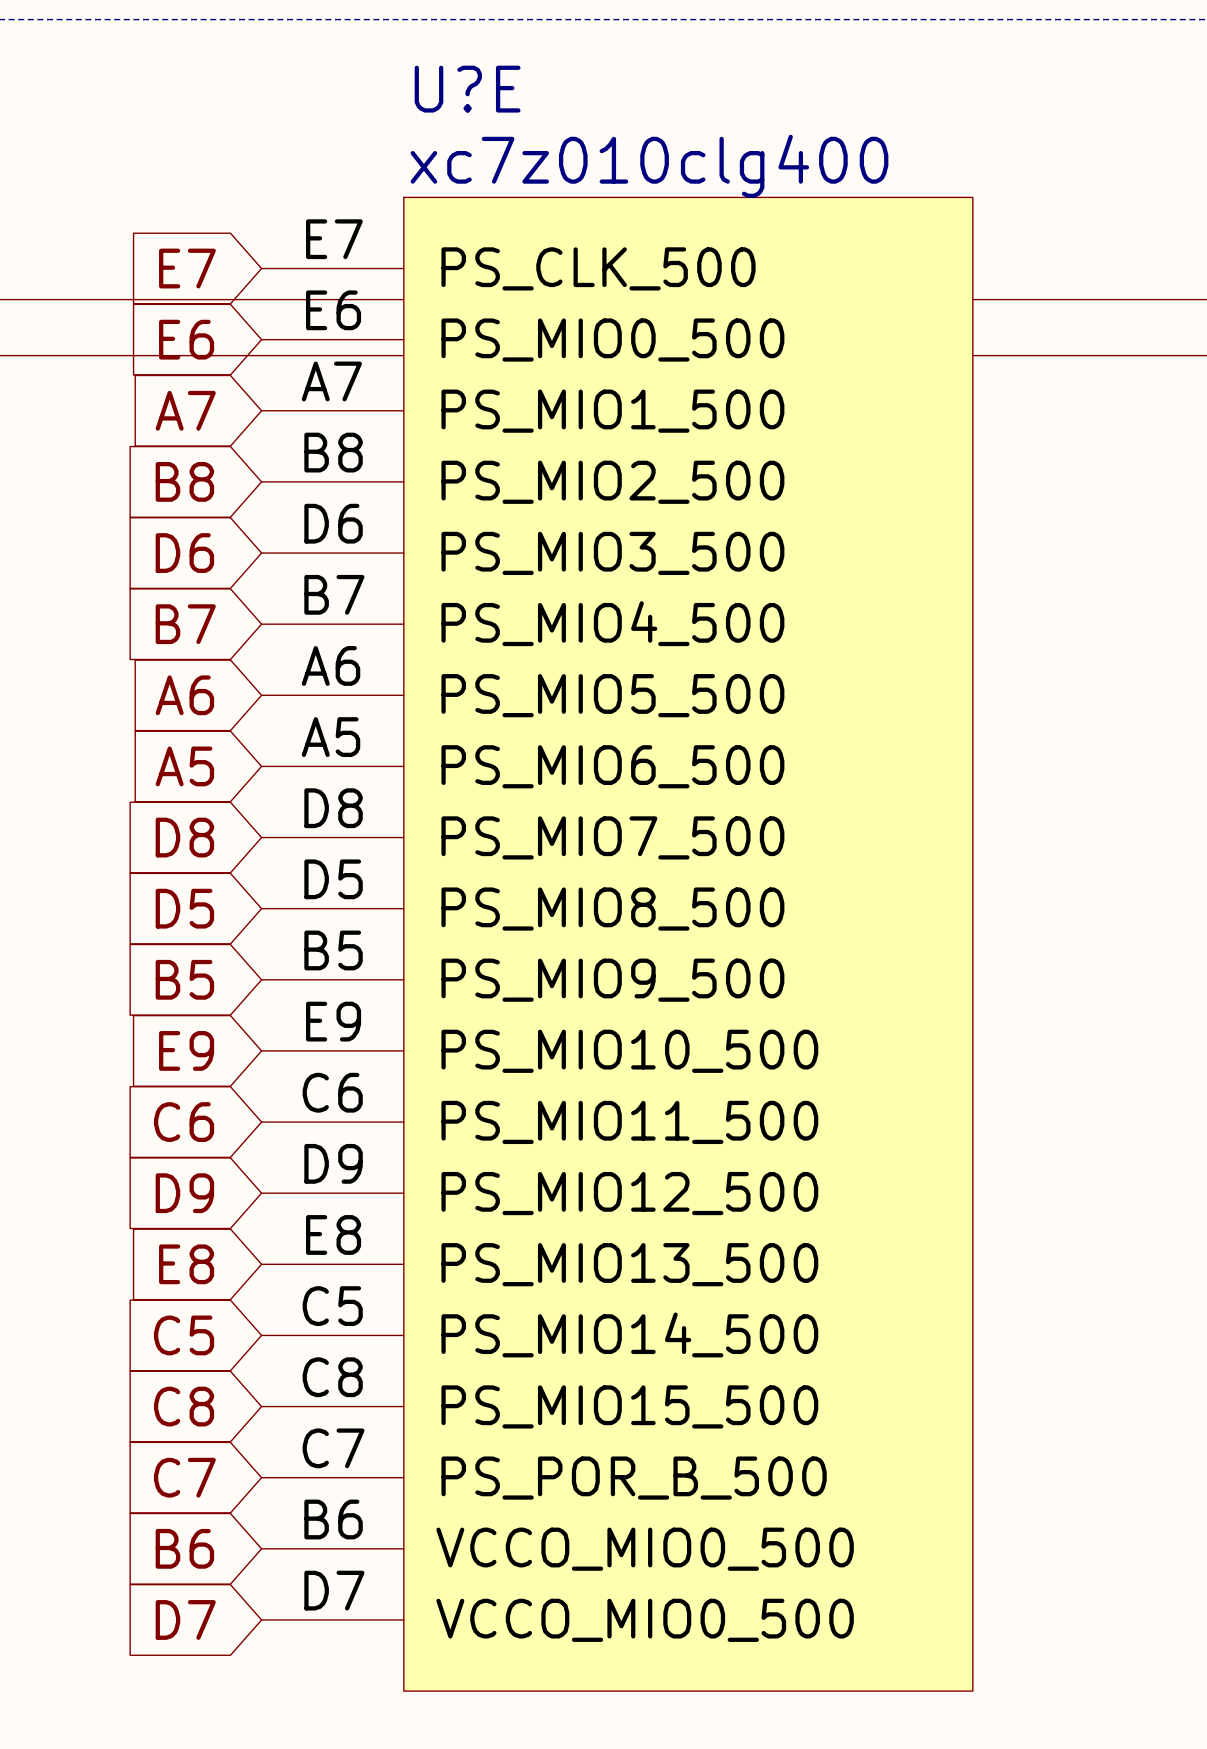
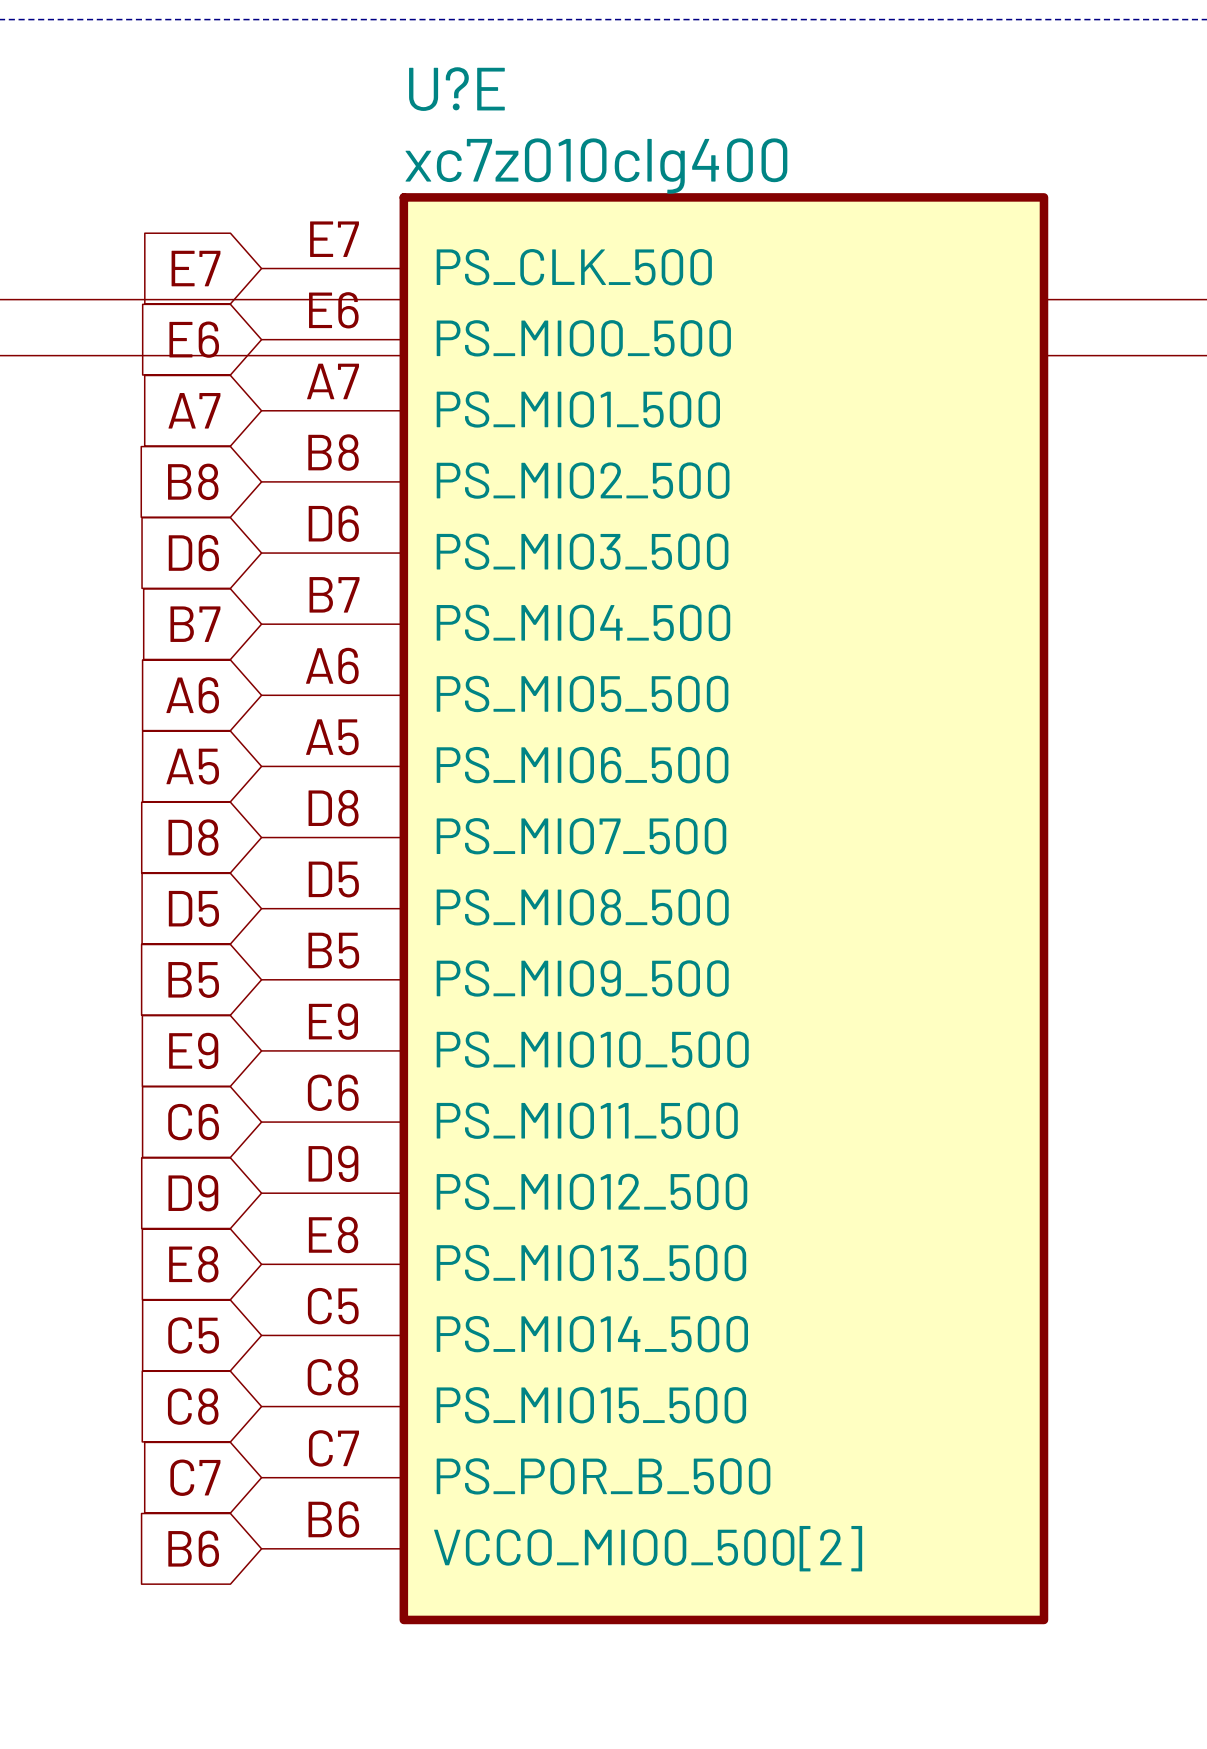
U?E: none -> xc7z010clg400 (654, 908)
U?E: xc7z010clg400 (617, 944) -> none
global label: D7 (185, 1619) -> none

